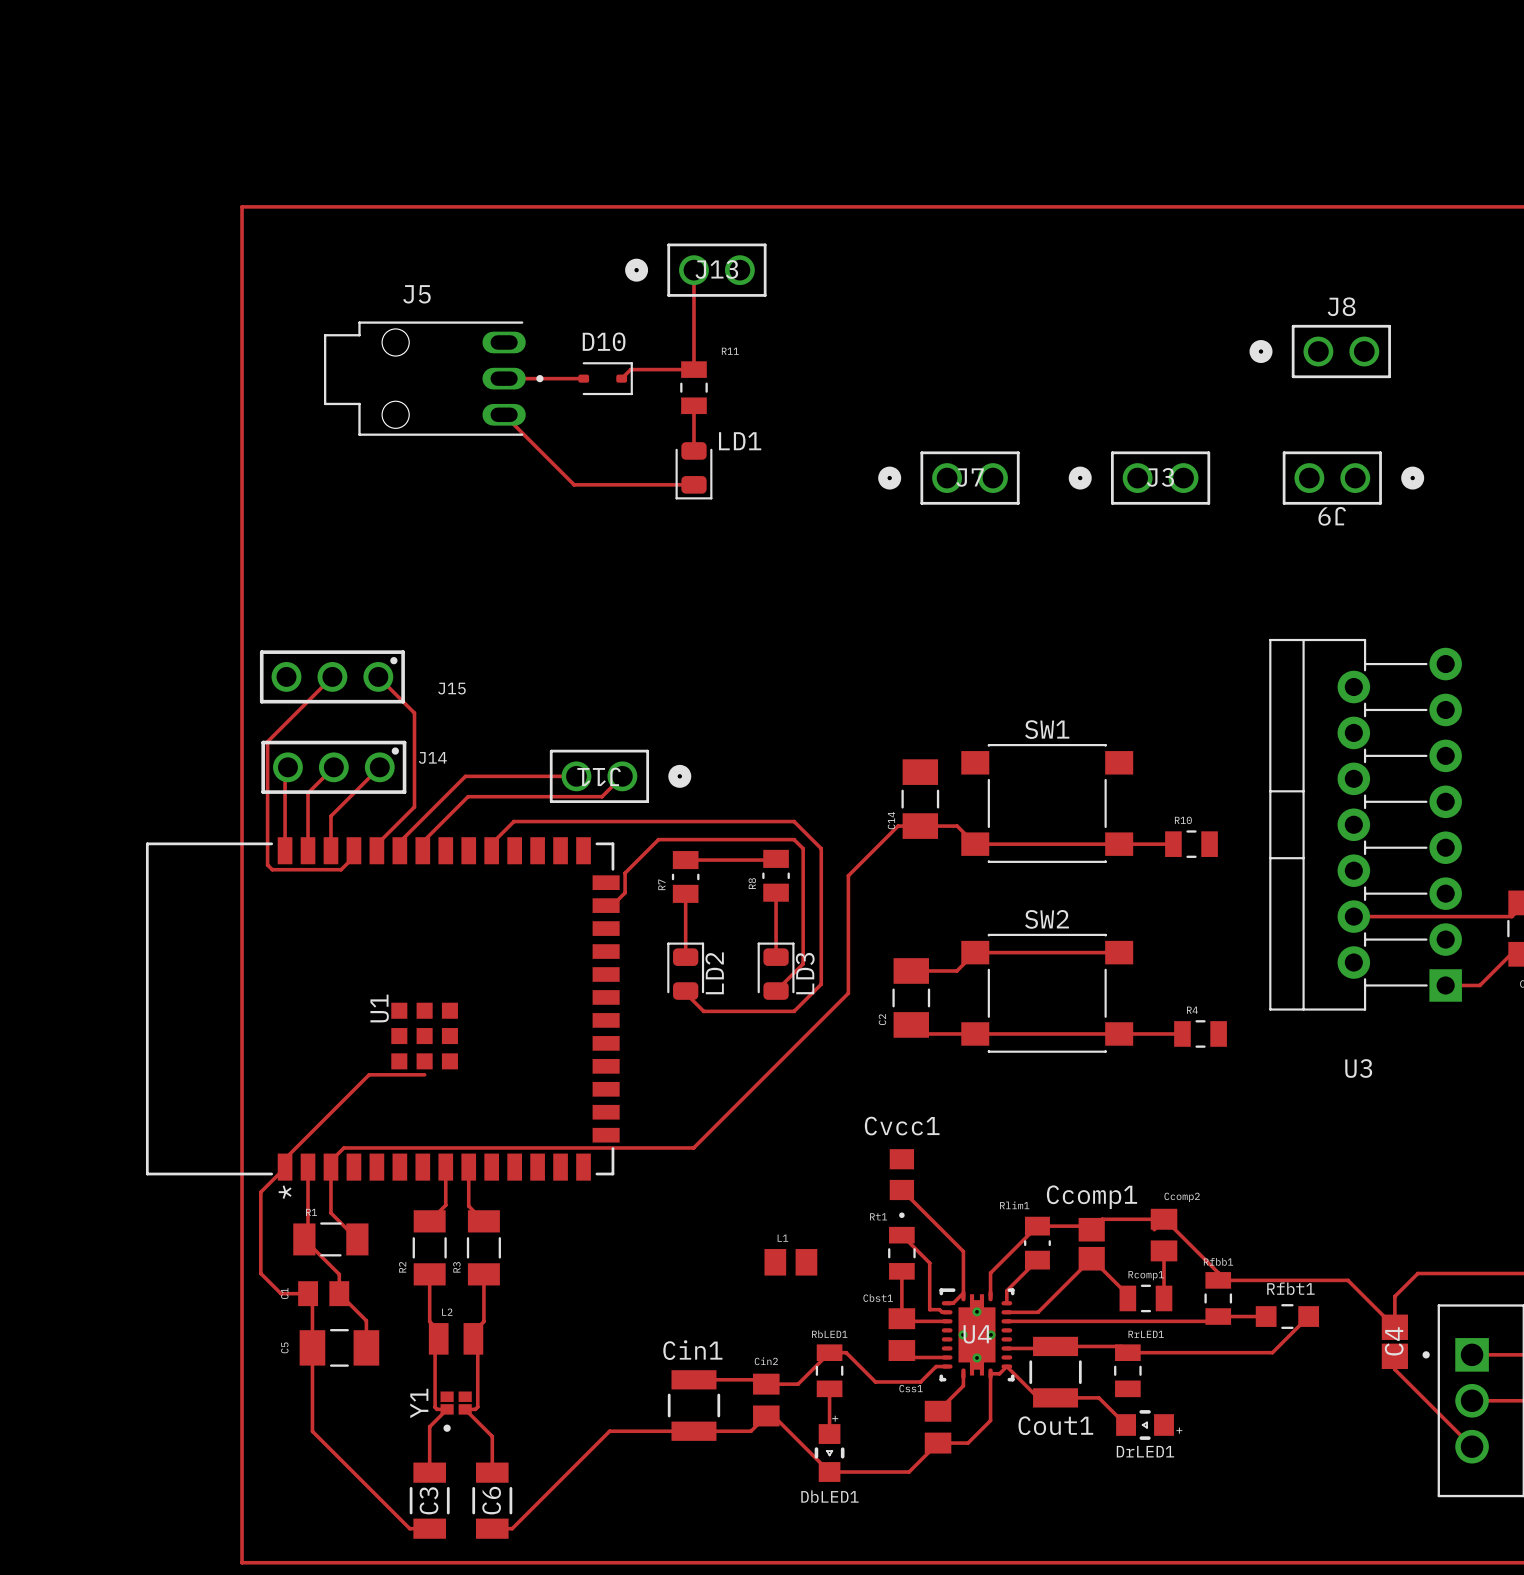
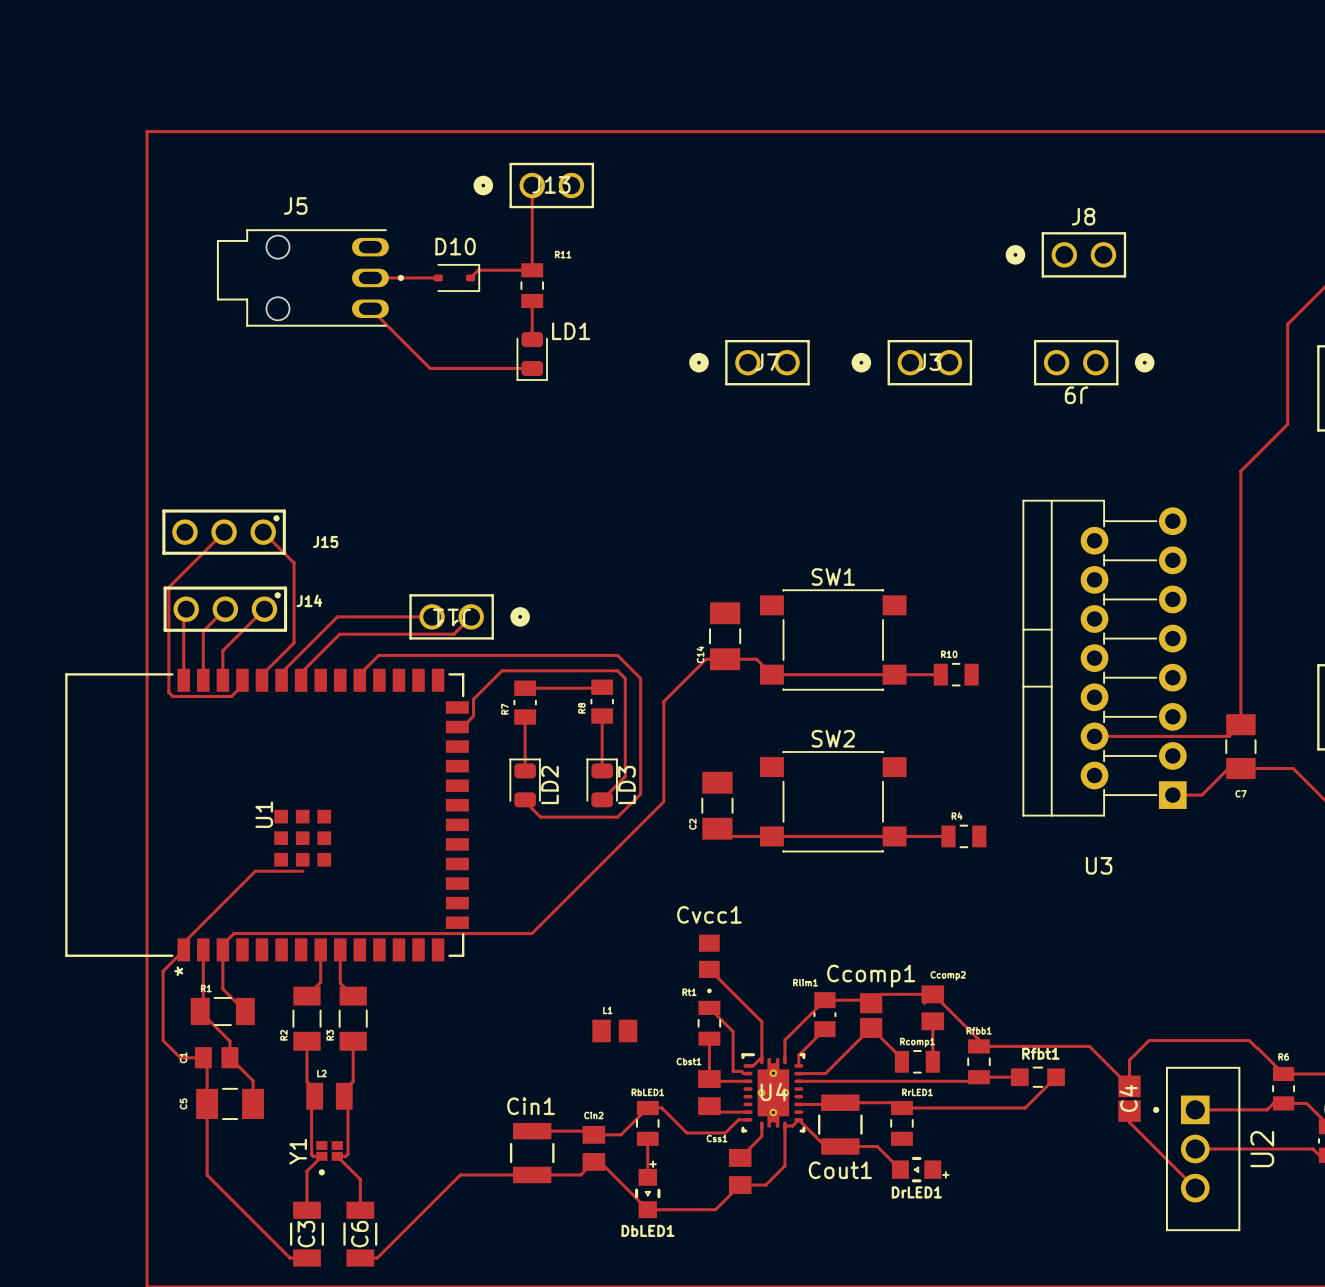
track: (1119, 952) (975, 952) (956, 970) (911, 970) -> none

